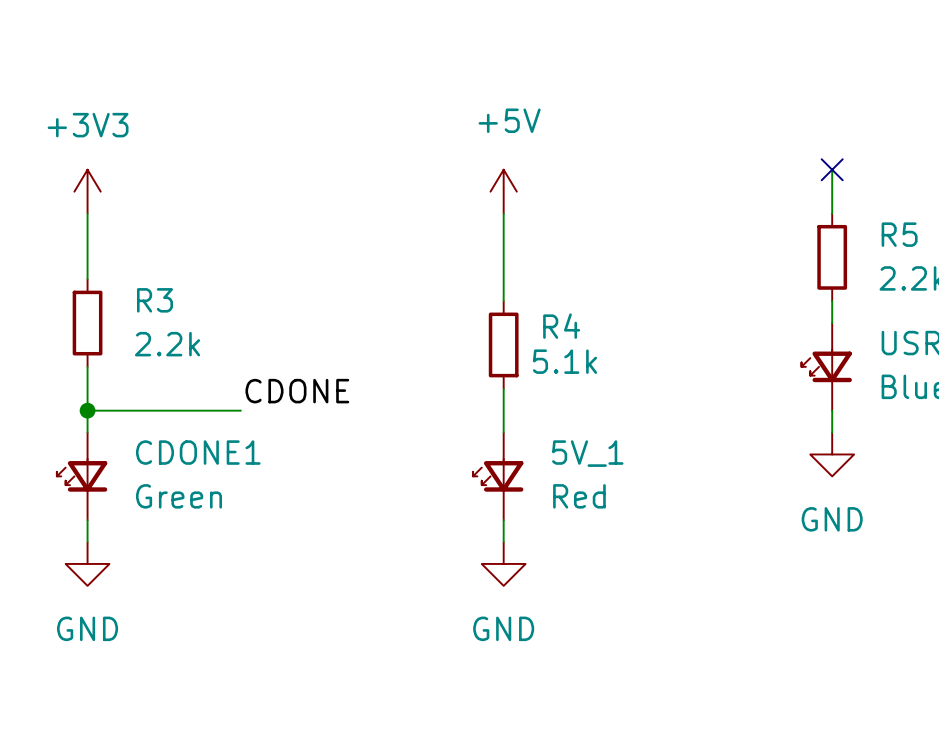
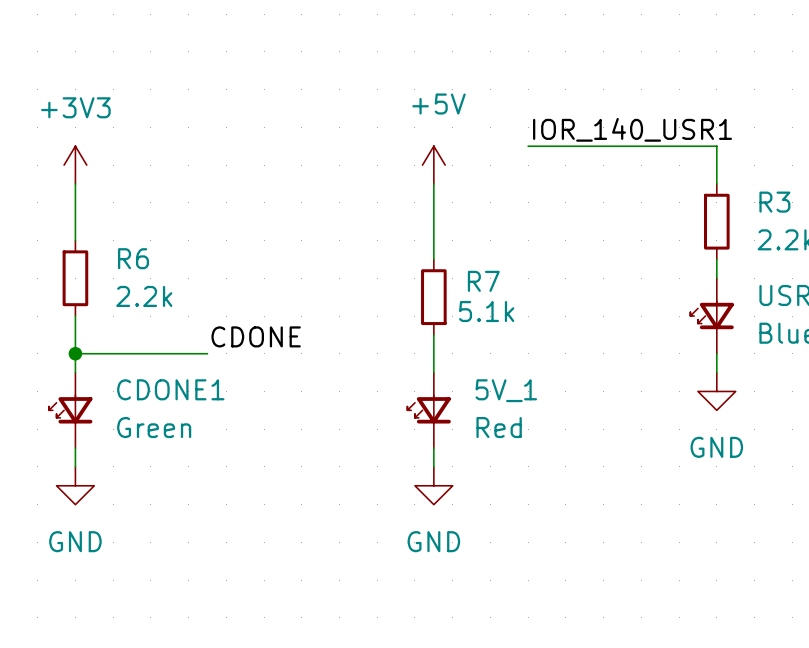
label: none -> IOR_140_USR1 (632, 129)
wire: none -> (528, 146) (716, 146)
no-connect mark: (832, 169) -> none
R5 name: R5 (899, 234) -> R3 (774, 202)
R3 name: R3 (154, 300) -> R6 (133, 258)
R4 name: R4 (561, 326) -> R7 (483, 281)

